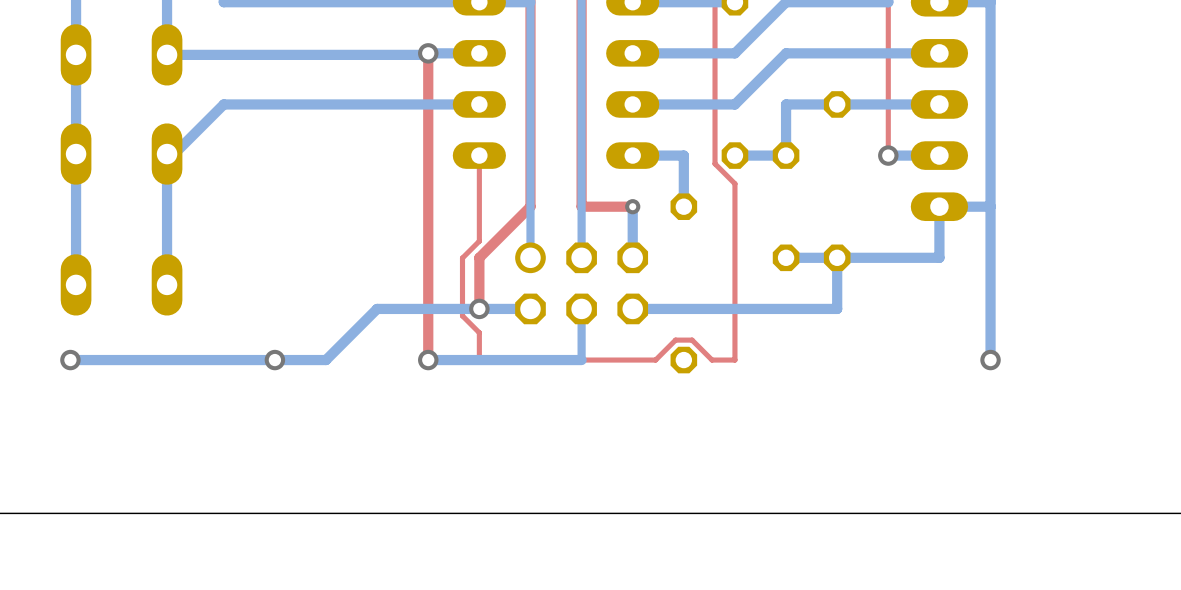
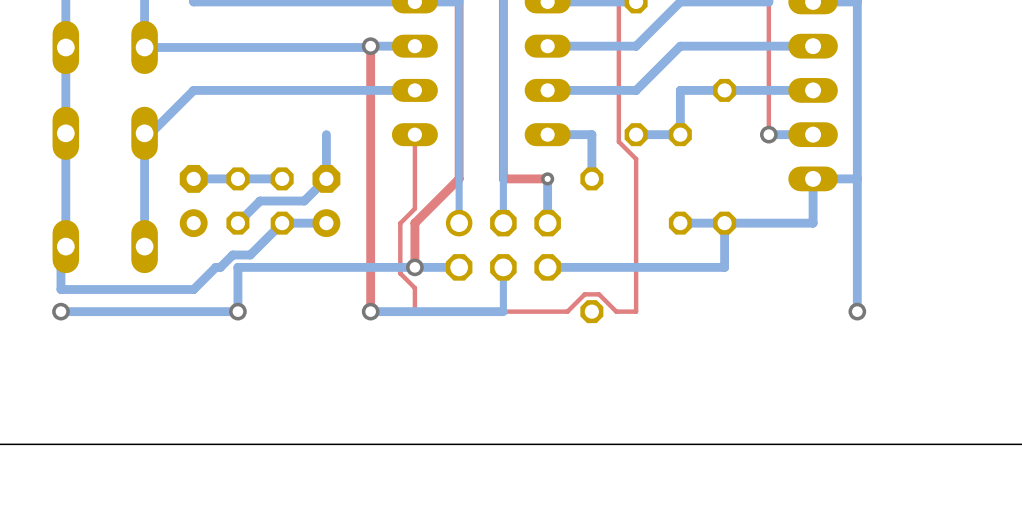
bottom track: none -> (326, 134) (326, 178) (304, 201) (260, 201) (237, 223)
bottom track: none -> (282, 178) (193, 178)
part: none -> (193, 201)
part: none -> (237, 201)
part: none -> (282, 201)
part: none -> (326, 201)
bottom track: none -> (326, 223) (282, 223) (250, 254) (232, 254) (220, 267) (215, 267) (193, 289) (60, 289) (60, 251)
bottom track: (377, 308) (326, 360) (274, 360) -> (326, 267) (237, 267) (237, 311)

